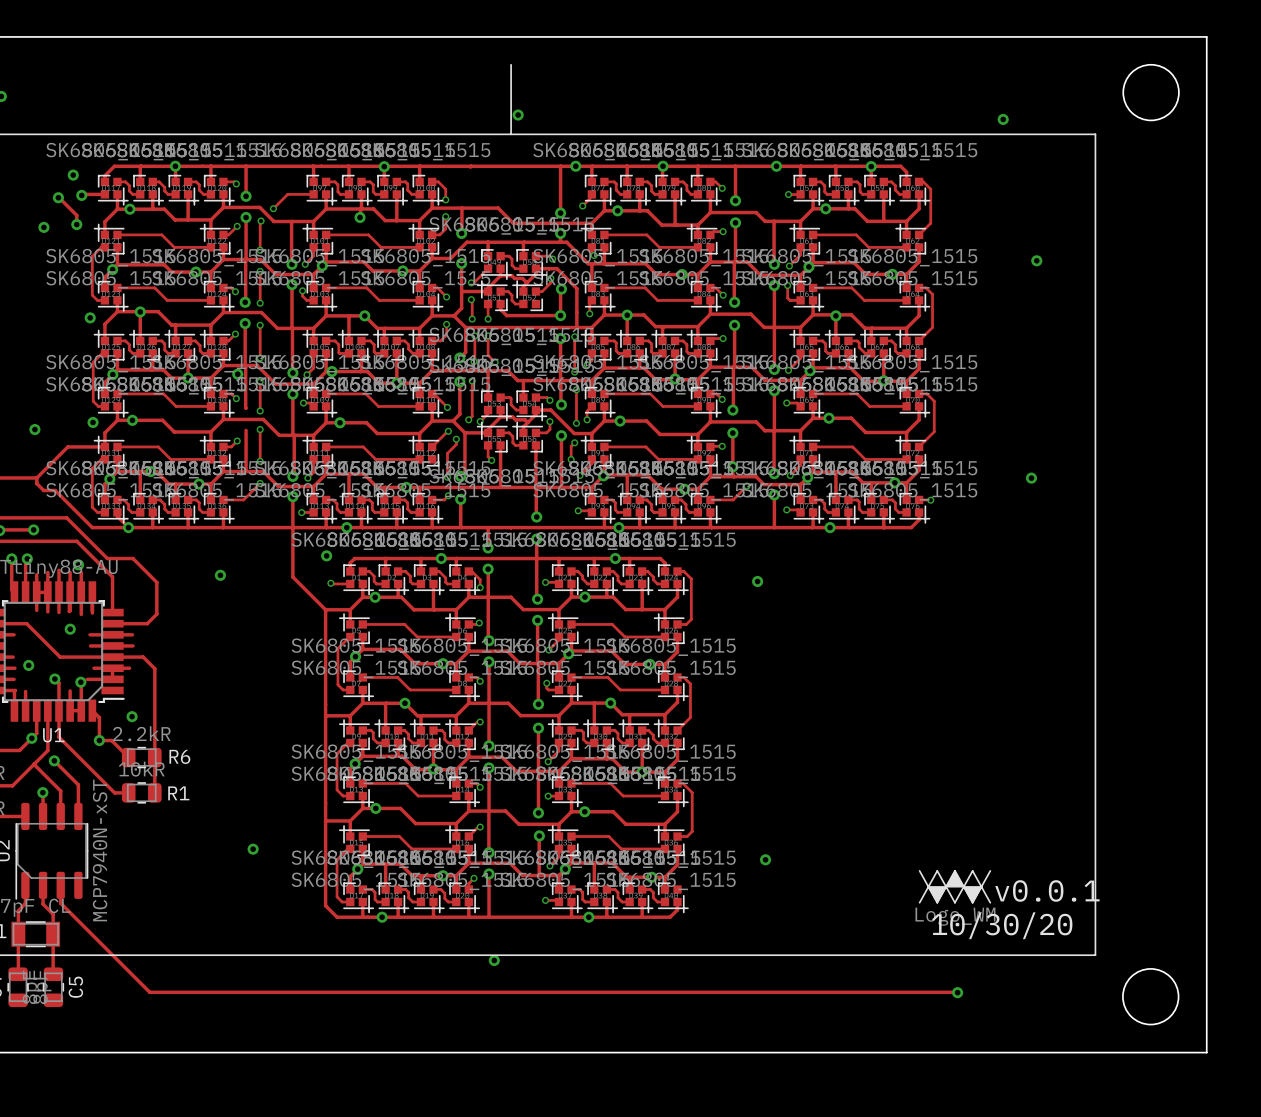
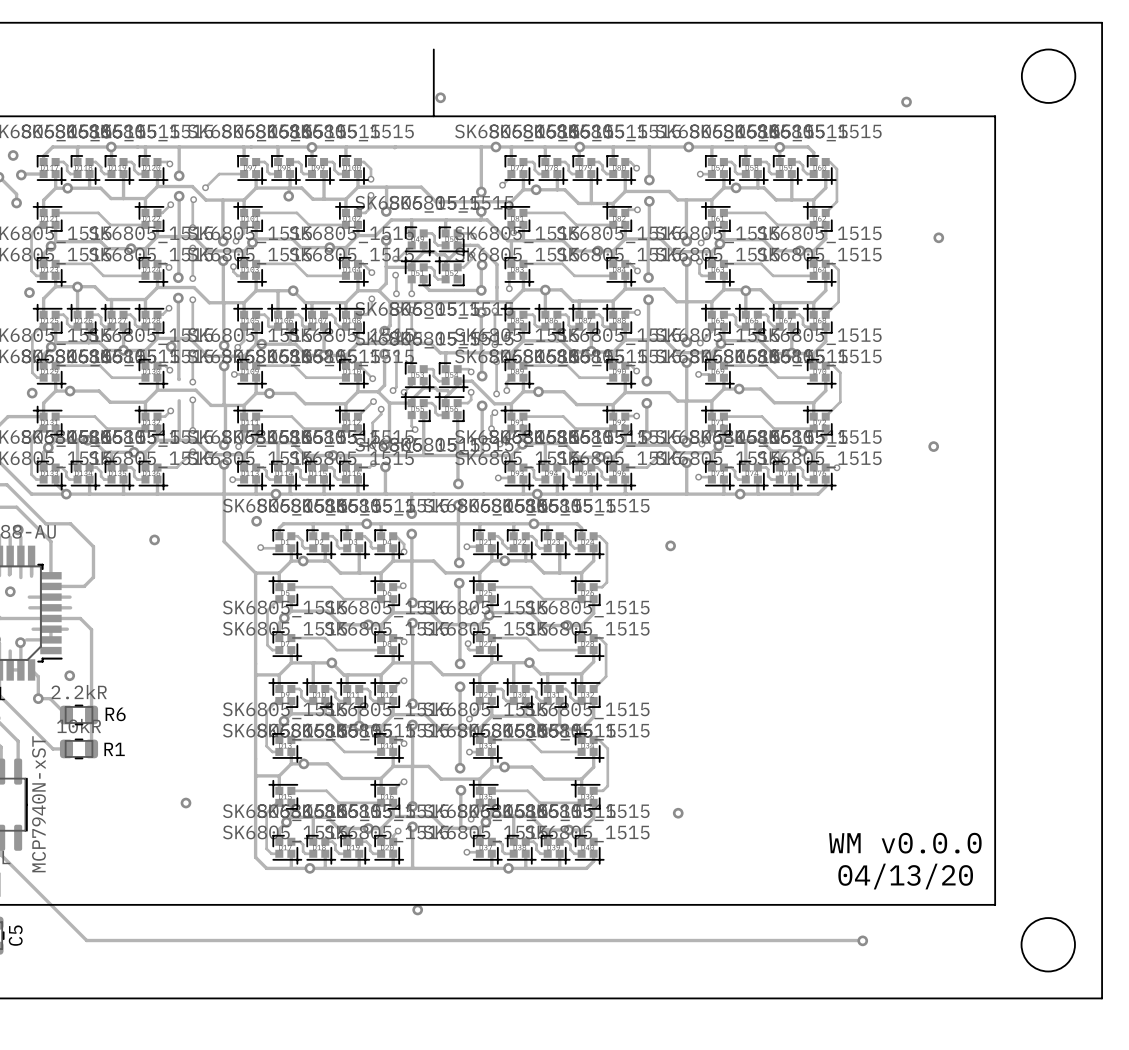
drawing: [918, 870, 992, 904] -> none
text: v0.0.1 (1047, 890) -> WM v0.0.0 (905, 843)
text: 10/30/20 (1002, 925) -> 04/13/20 (905, 876)

